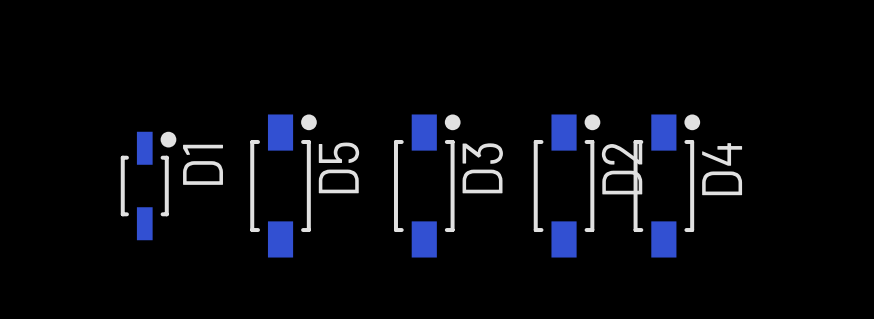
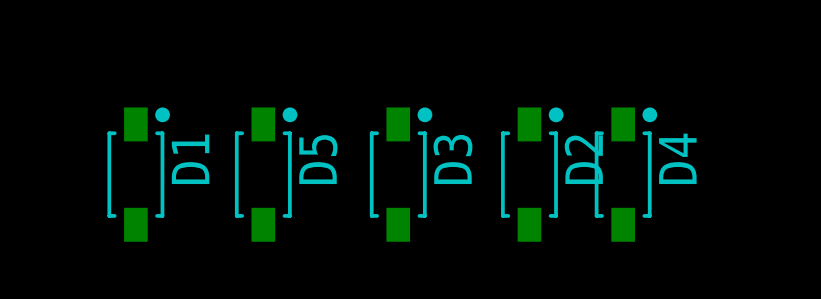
D1 footprint: [120, 131, 177, 241] -> [107, 107, 170, 242]

